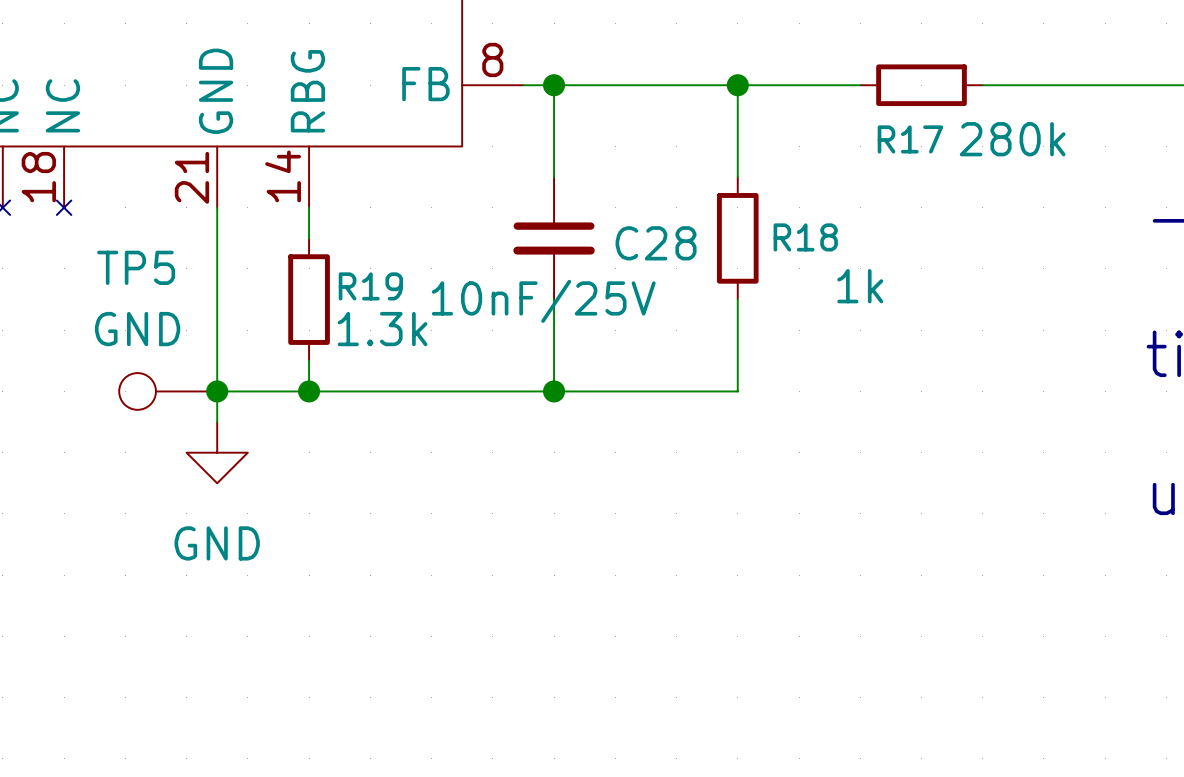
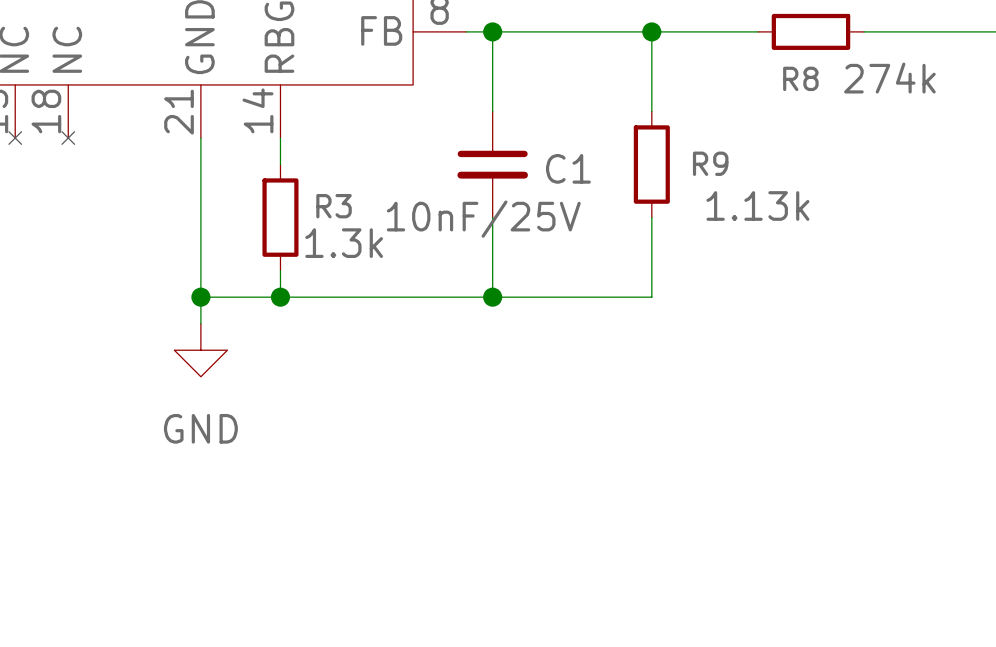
R17 name: R17 (910, 139) -> R8 (800, 78)
R17 value: 280k (1012, 139) -> 274k (889, 78)
R18 name: R18 (805, 237) -> R9 (710, 163)
C28 name: C28 (656, 243) -> C1 (568, 168)
R19 name: R19 (370, 286) -> R3 (334, 206)
R18 value: 1k (860, 286) -> 1.13k (757, 205)
TP5: GND (168, 391) -> none

